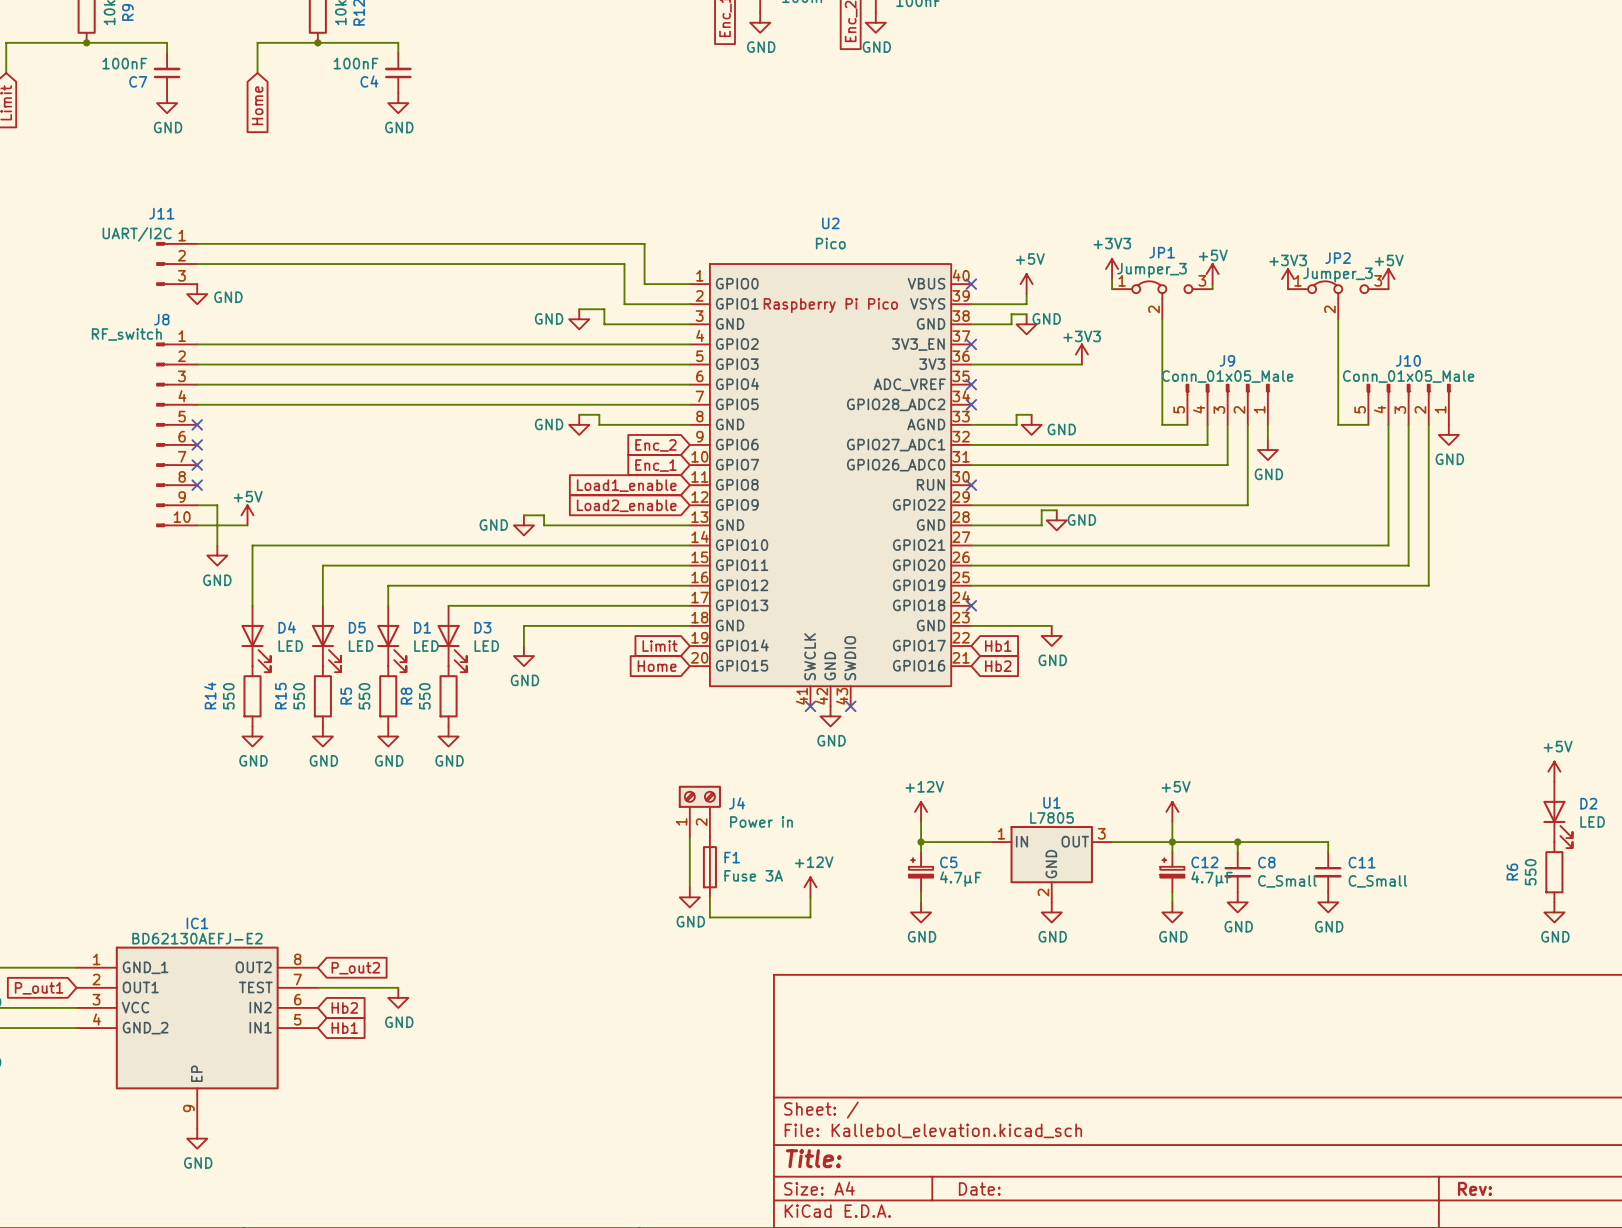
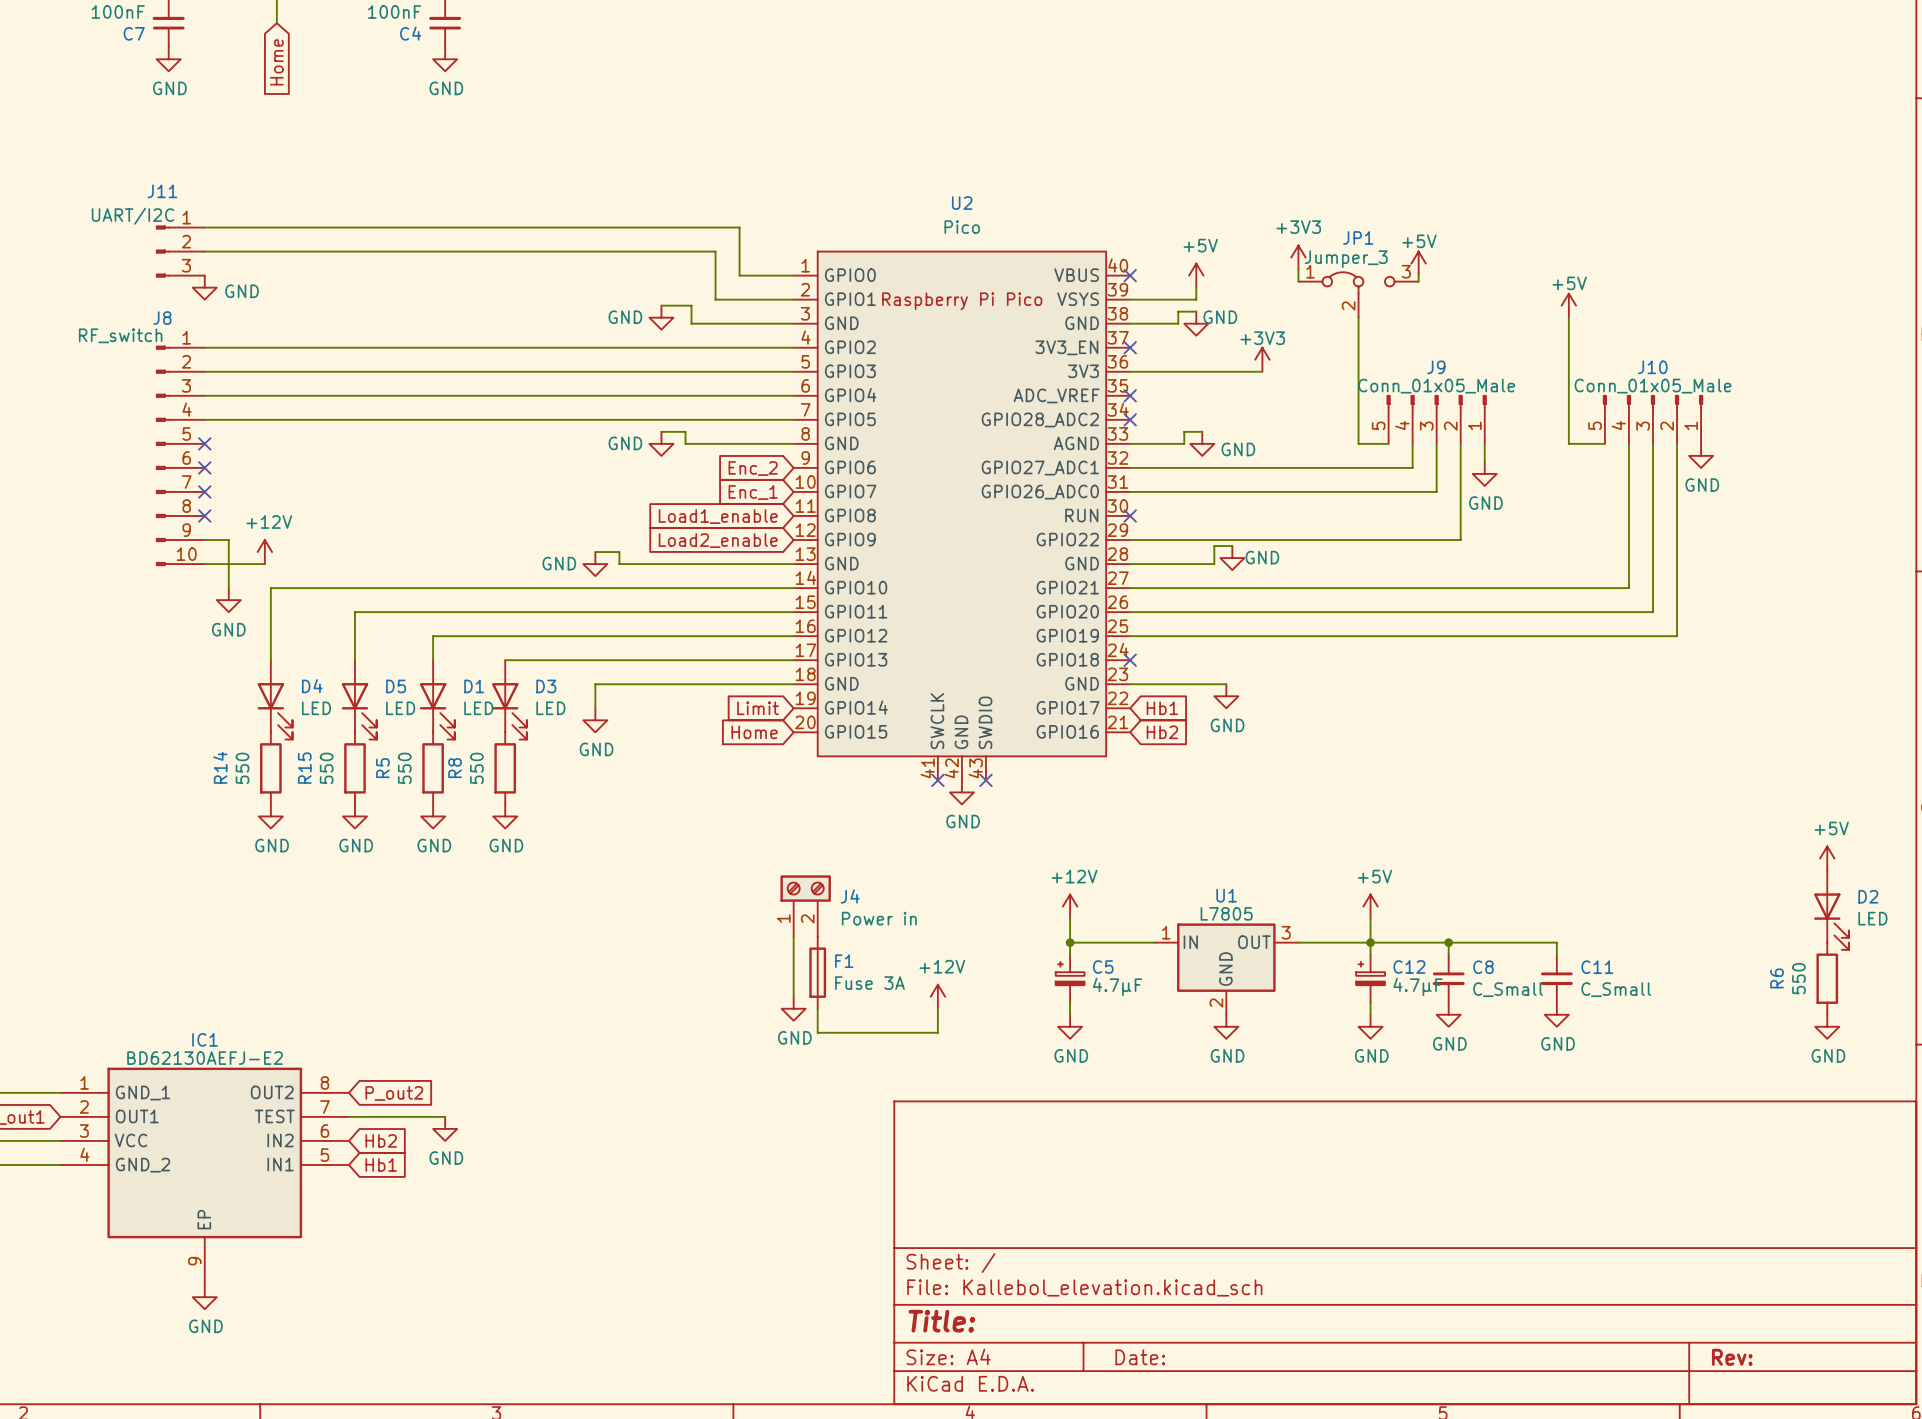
power symbol: +3V3 (1287, 279) -> none
power symbol position: +5V (1388, 279) -> +5V (1568, 305)
JP2: Jumper_3 (1338, 300) -> none
power symbol: +5V (247, 515) -> +12V (264, 552)

